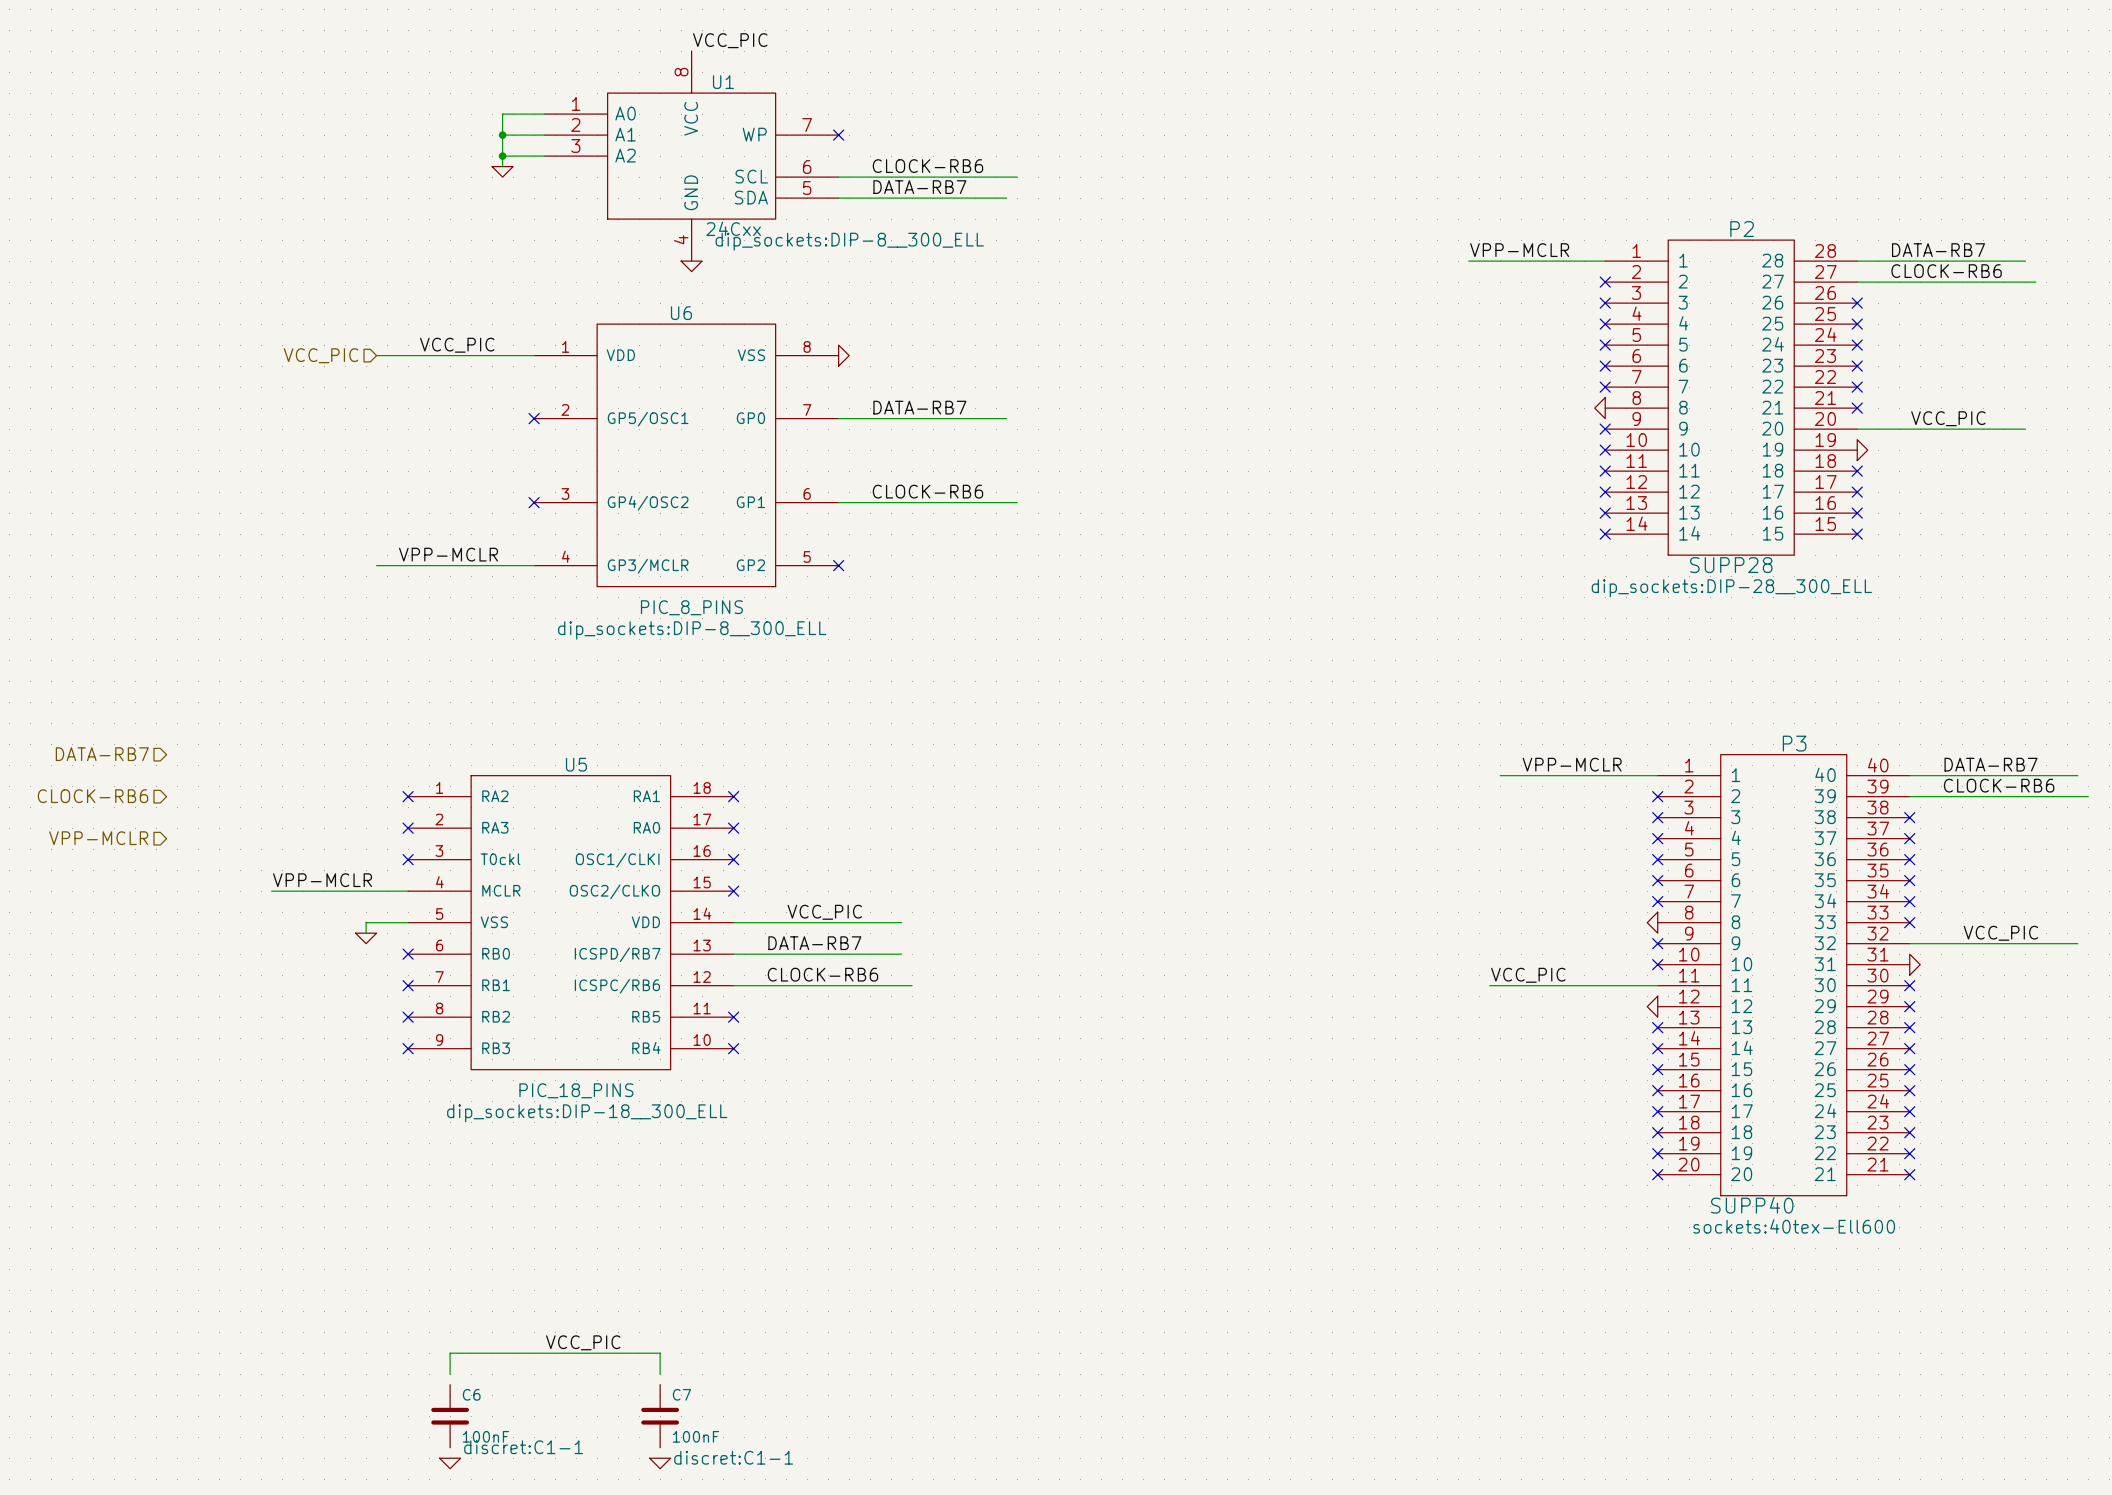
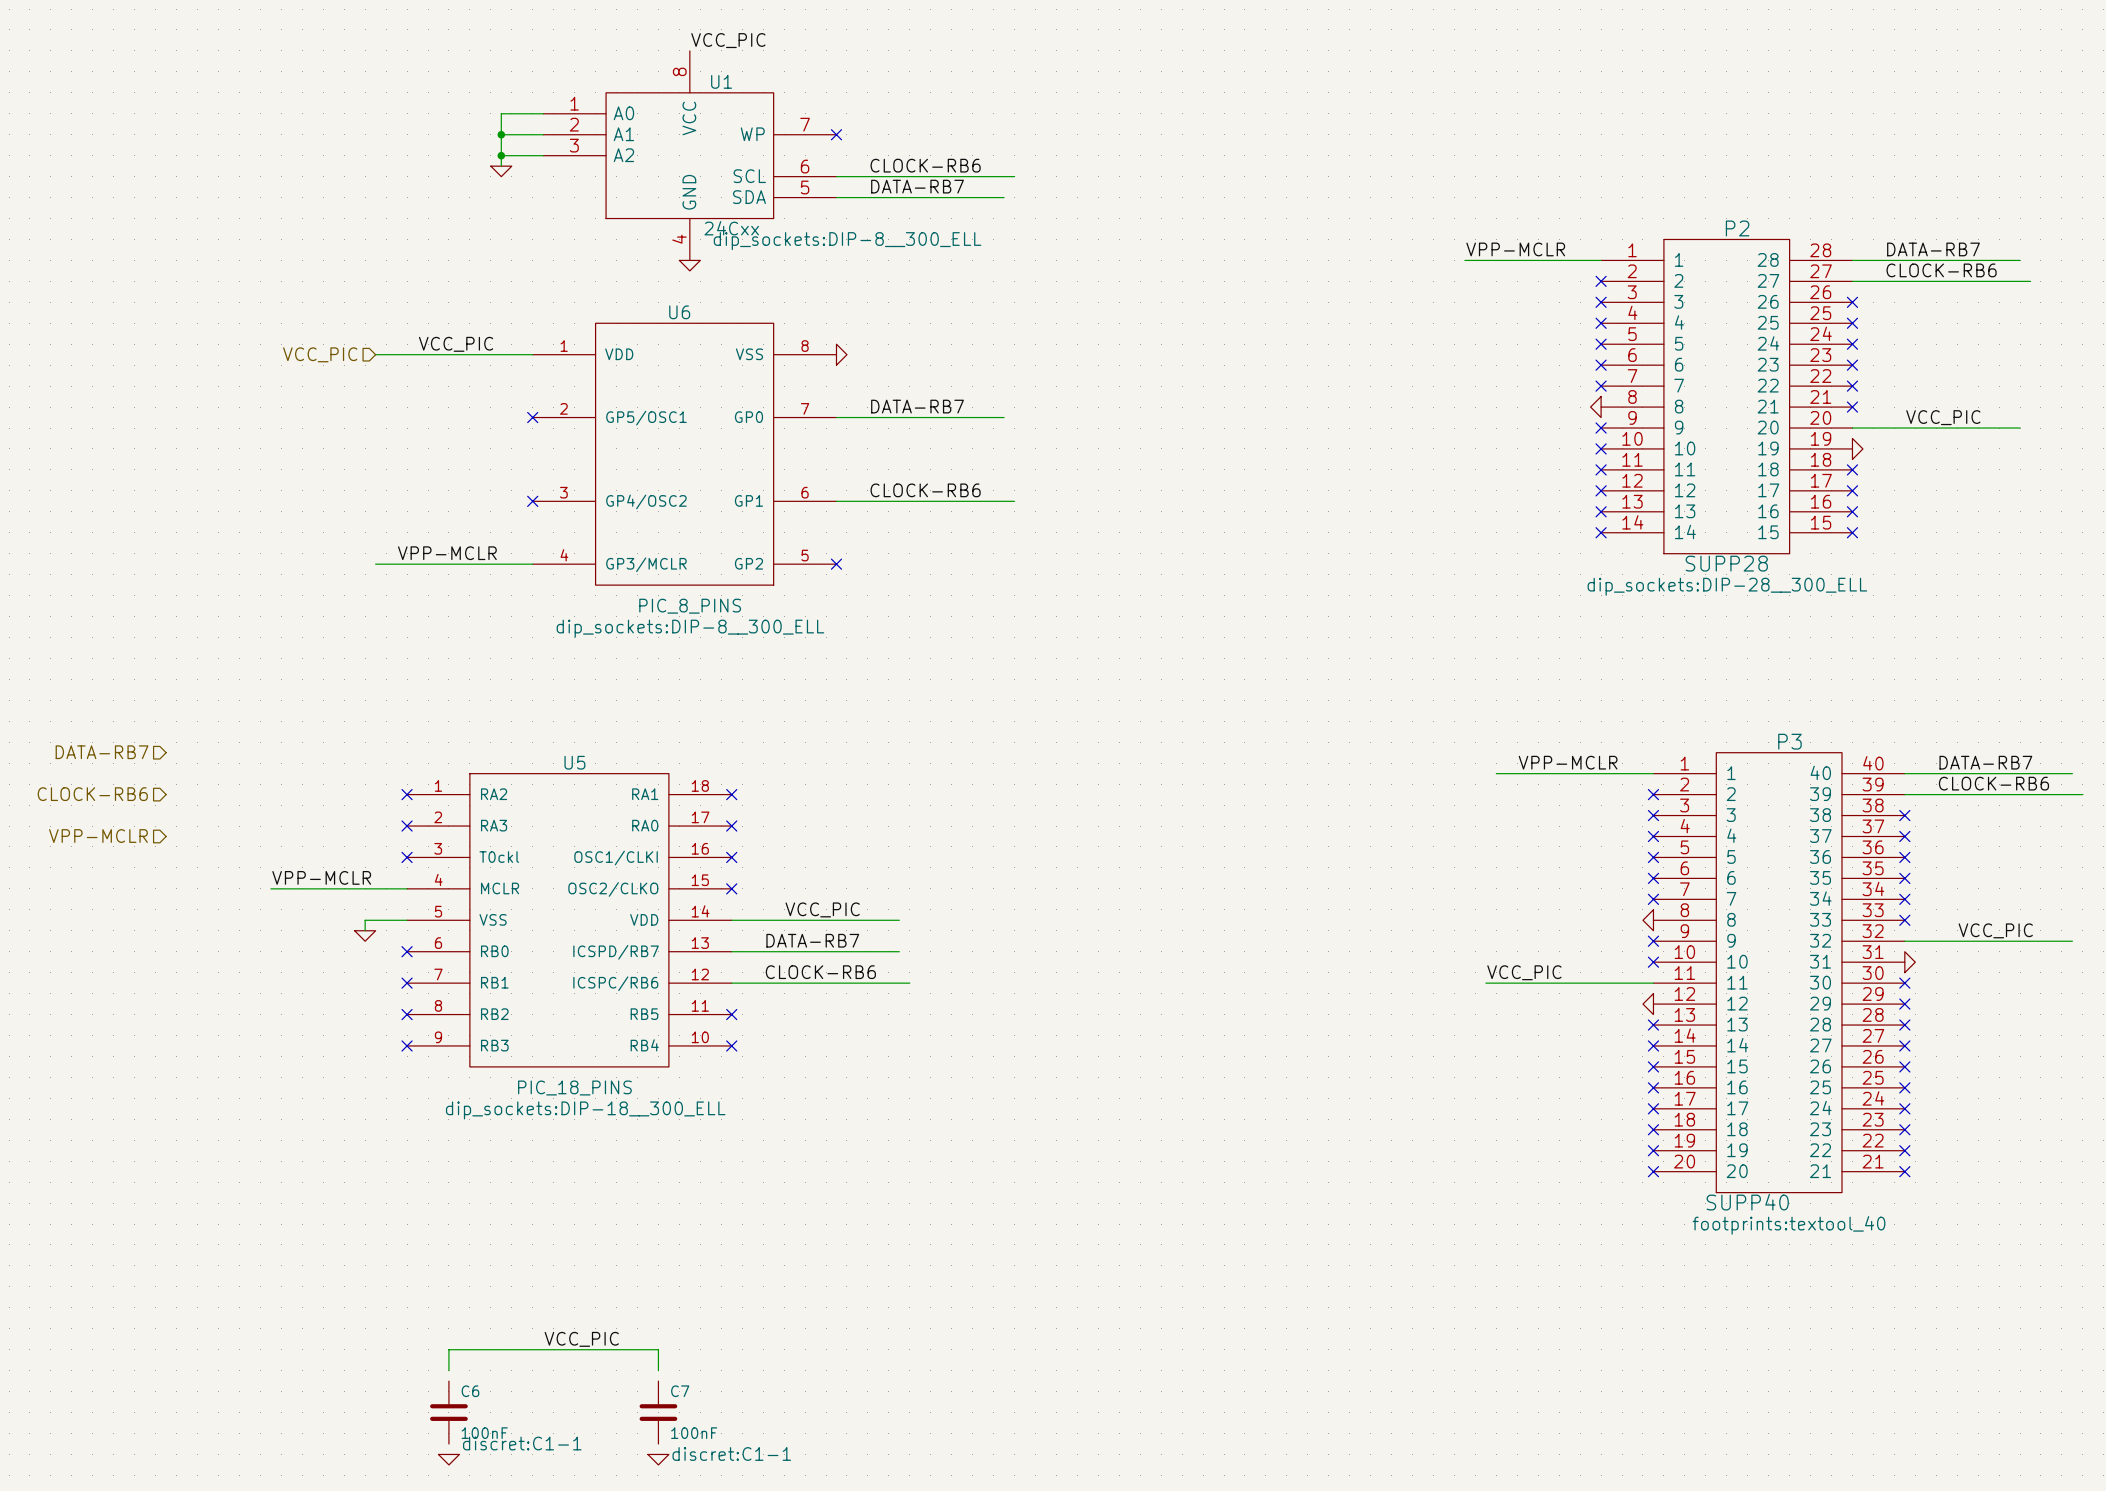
P3 text: sockets:40tex-Ell600 (1794, 1226) -> footprints:textool_40 (1789, 1225)

